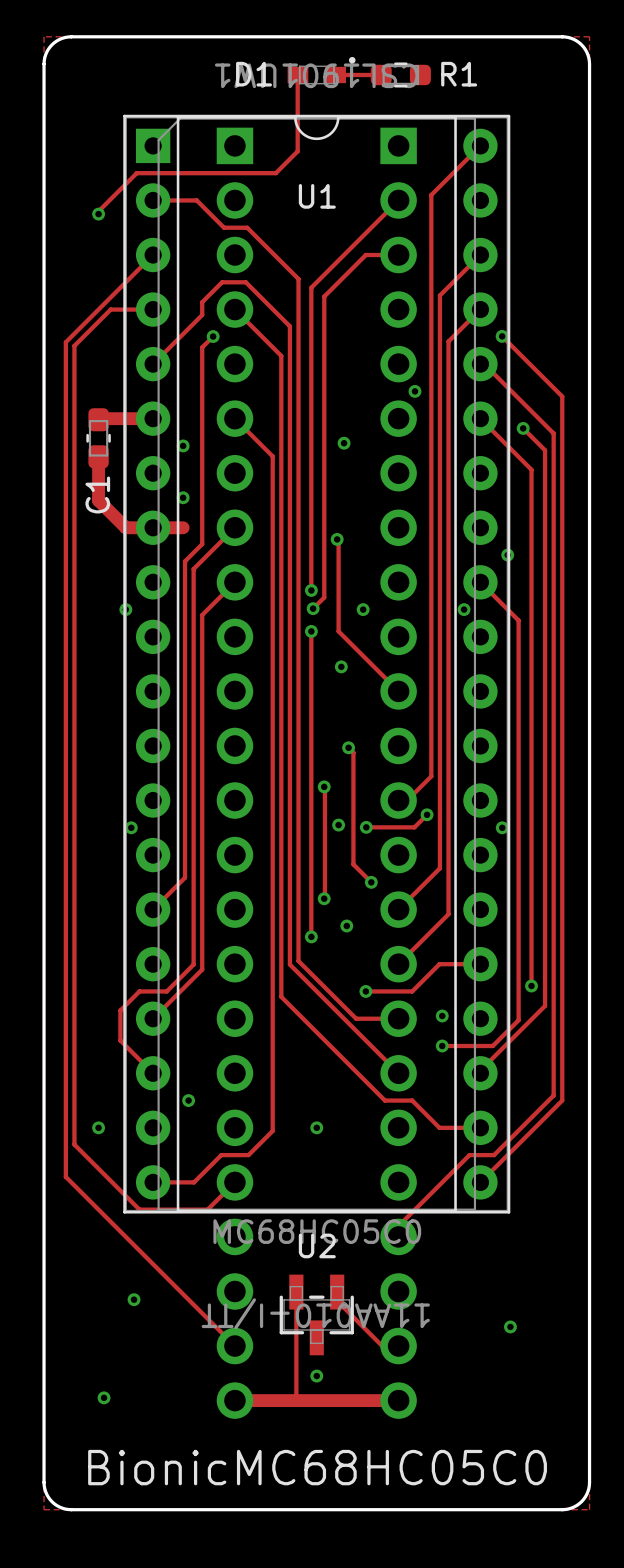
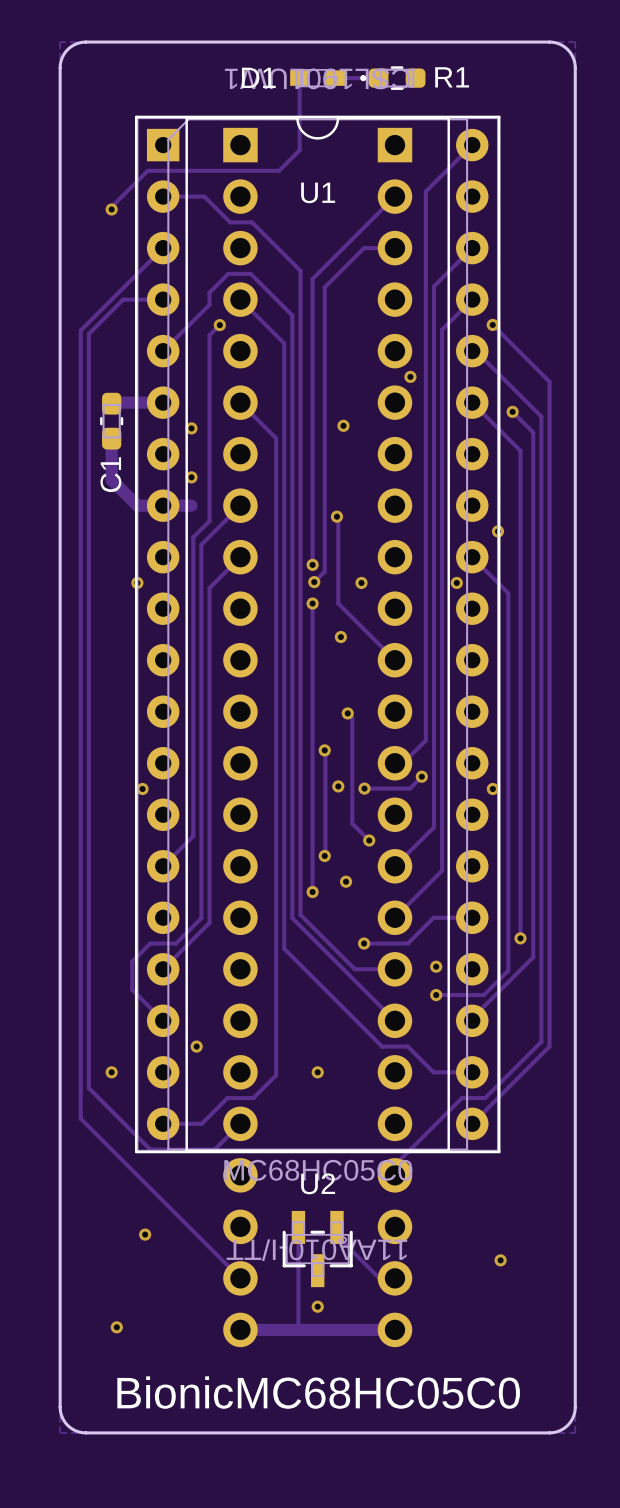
D1 footprint: [287, 56, 356, 84] -> [290, 69, 367, 87]

